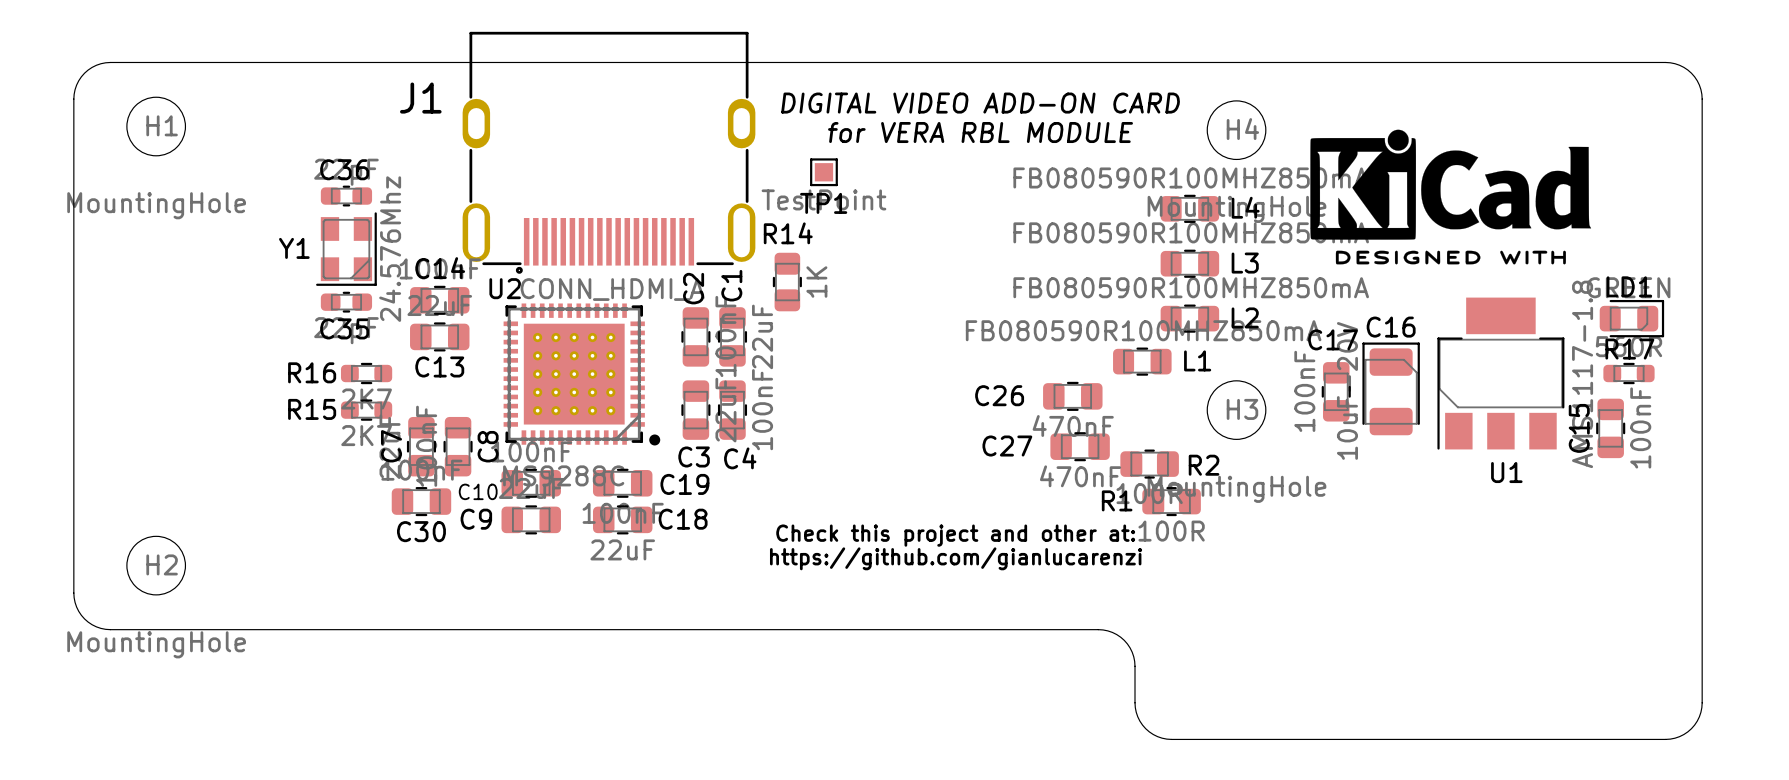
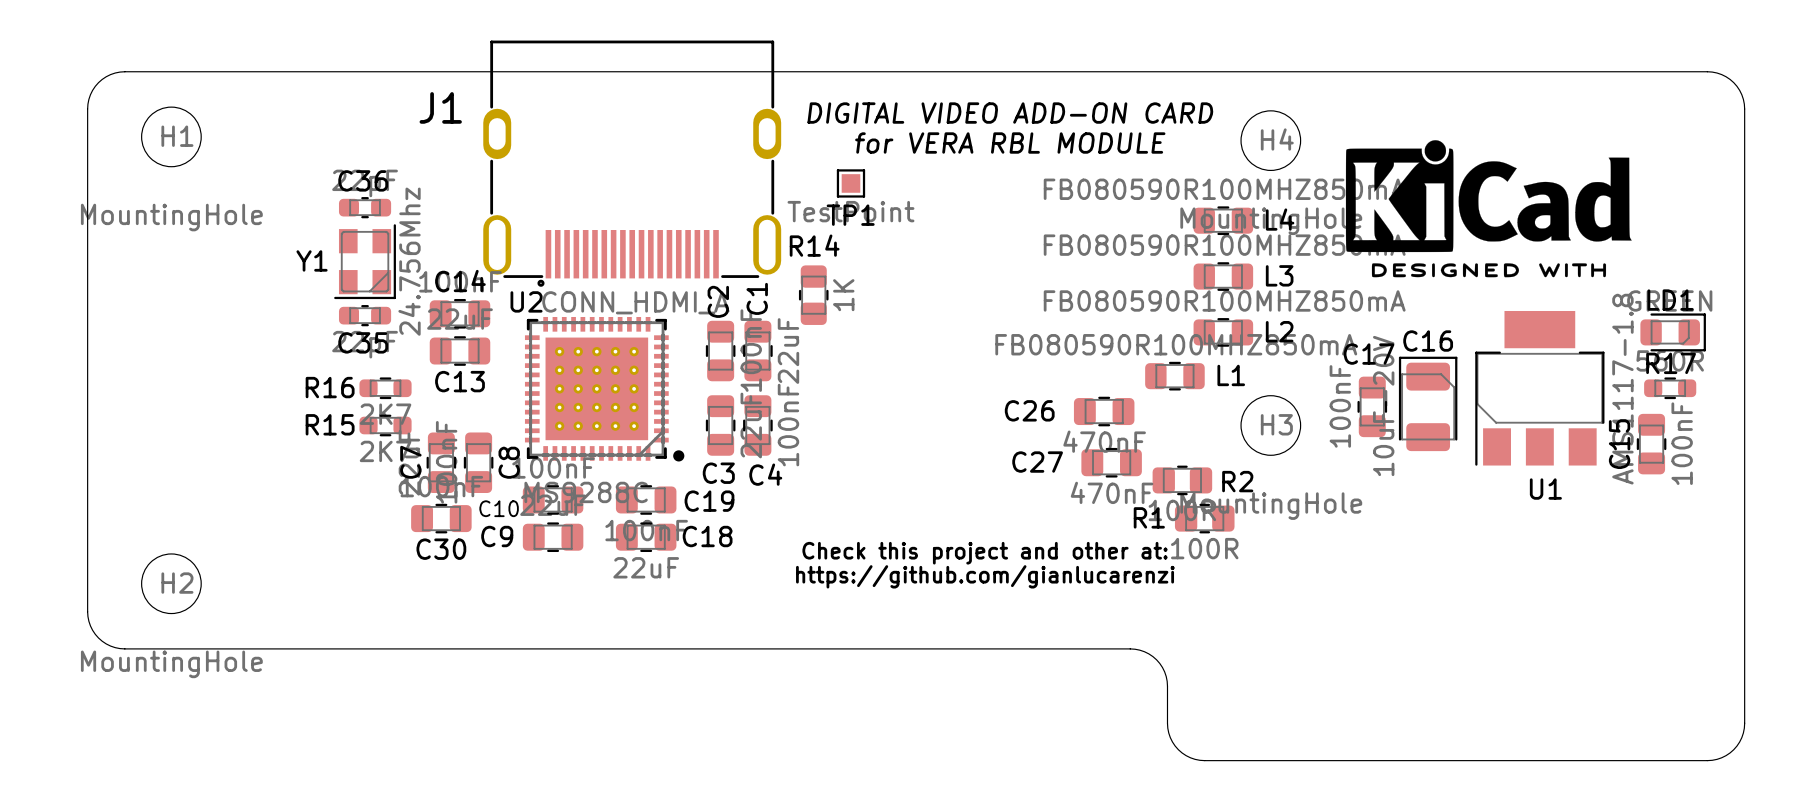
Y1 value: 24.576Mhz (390, 249) -> 24.756Mhz (409, 261)

